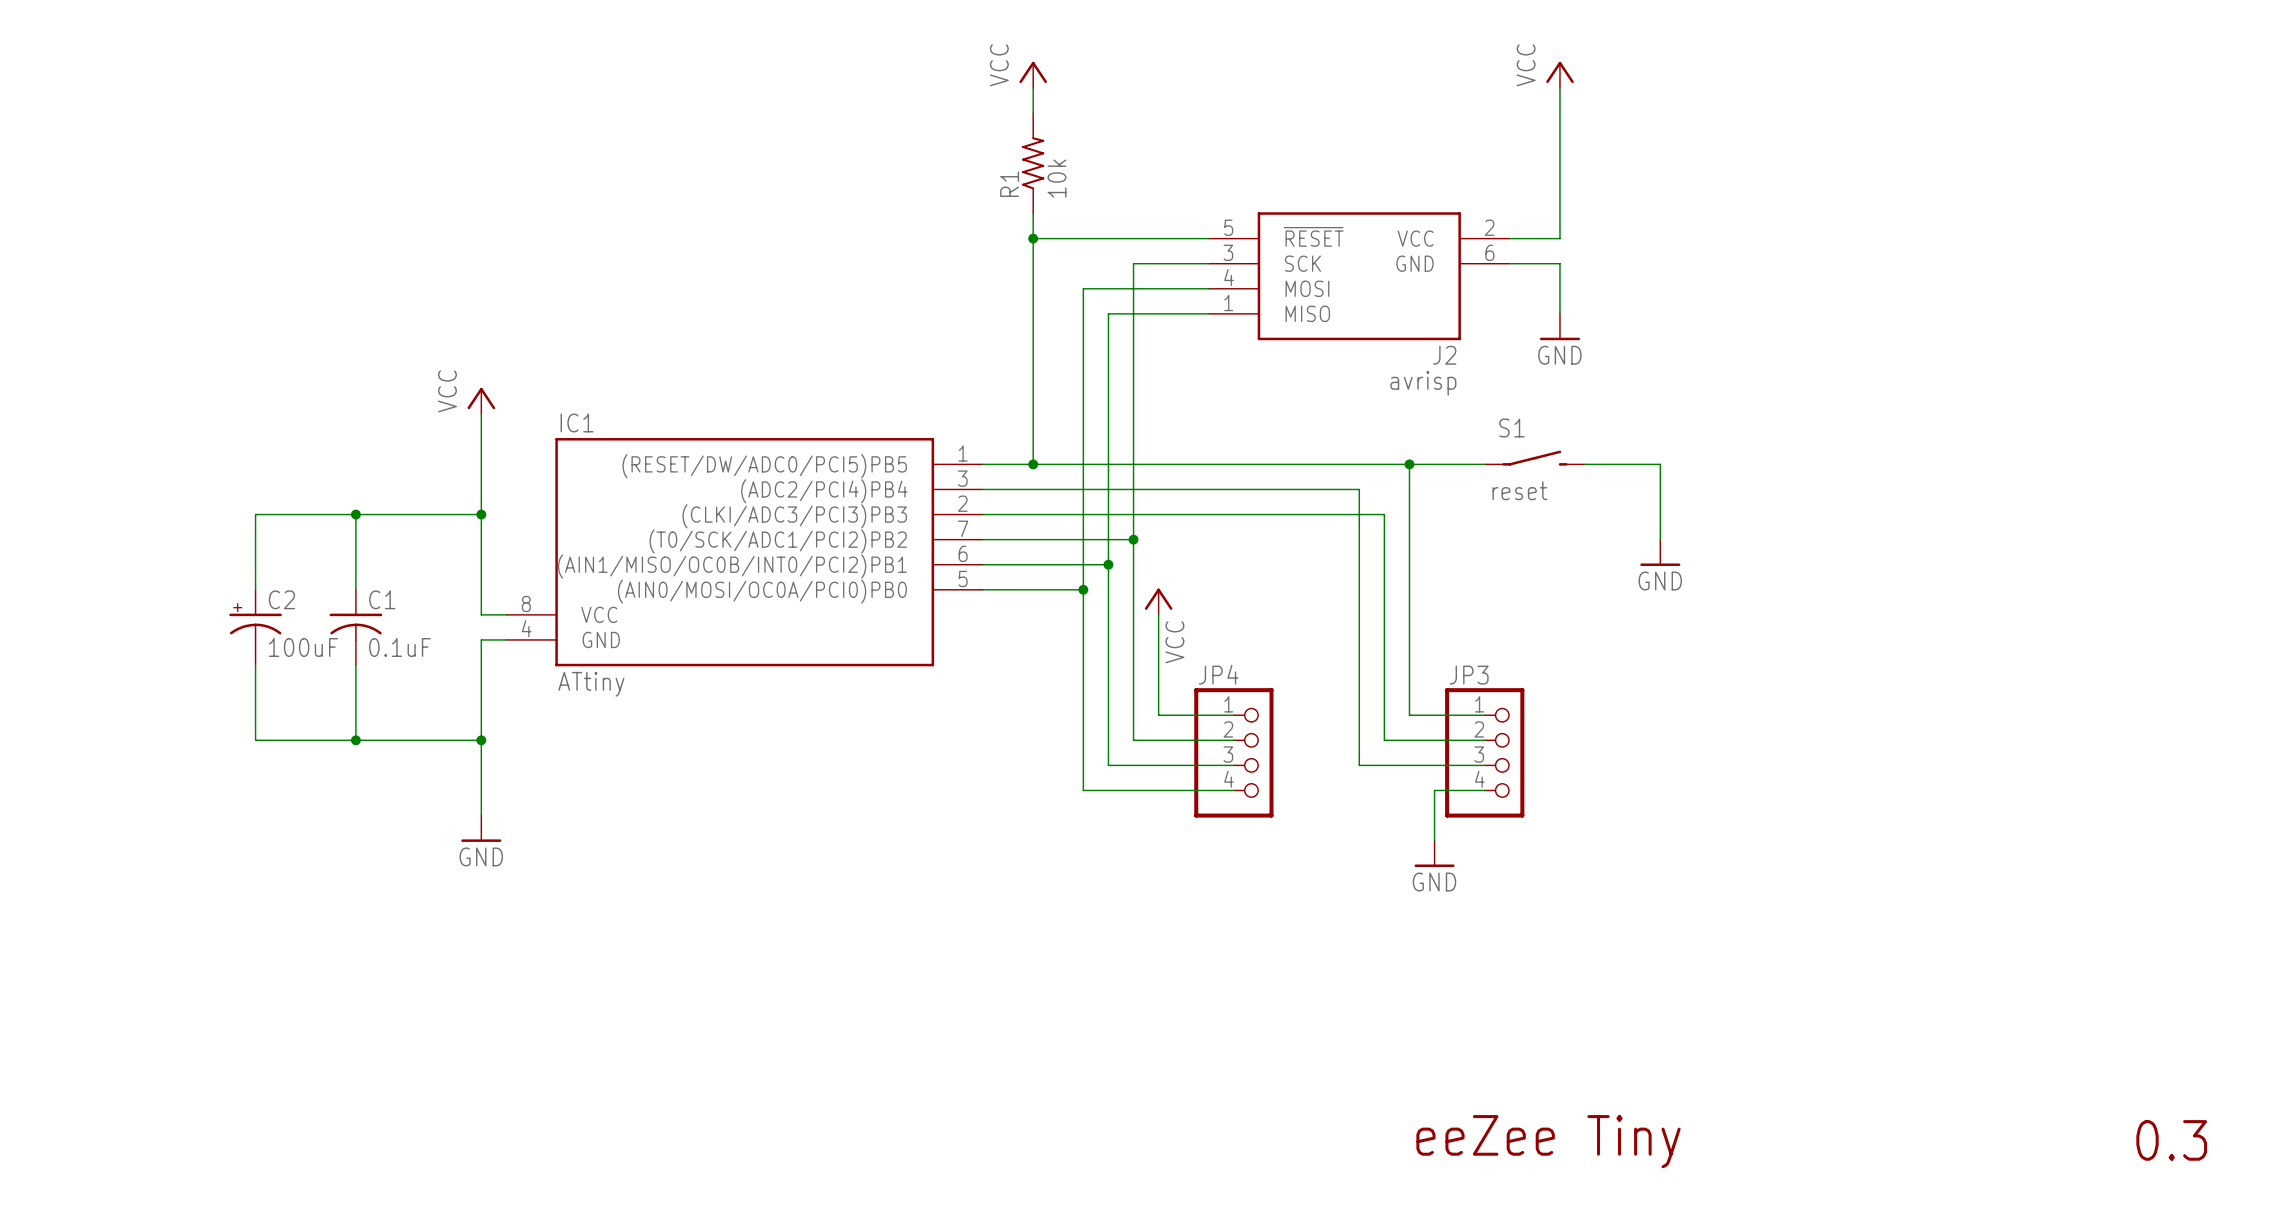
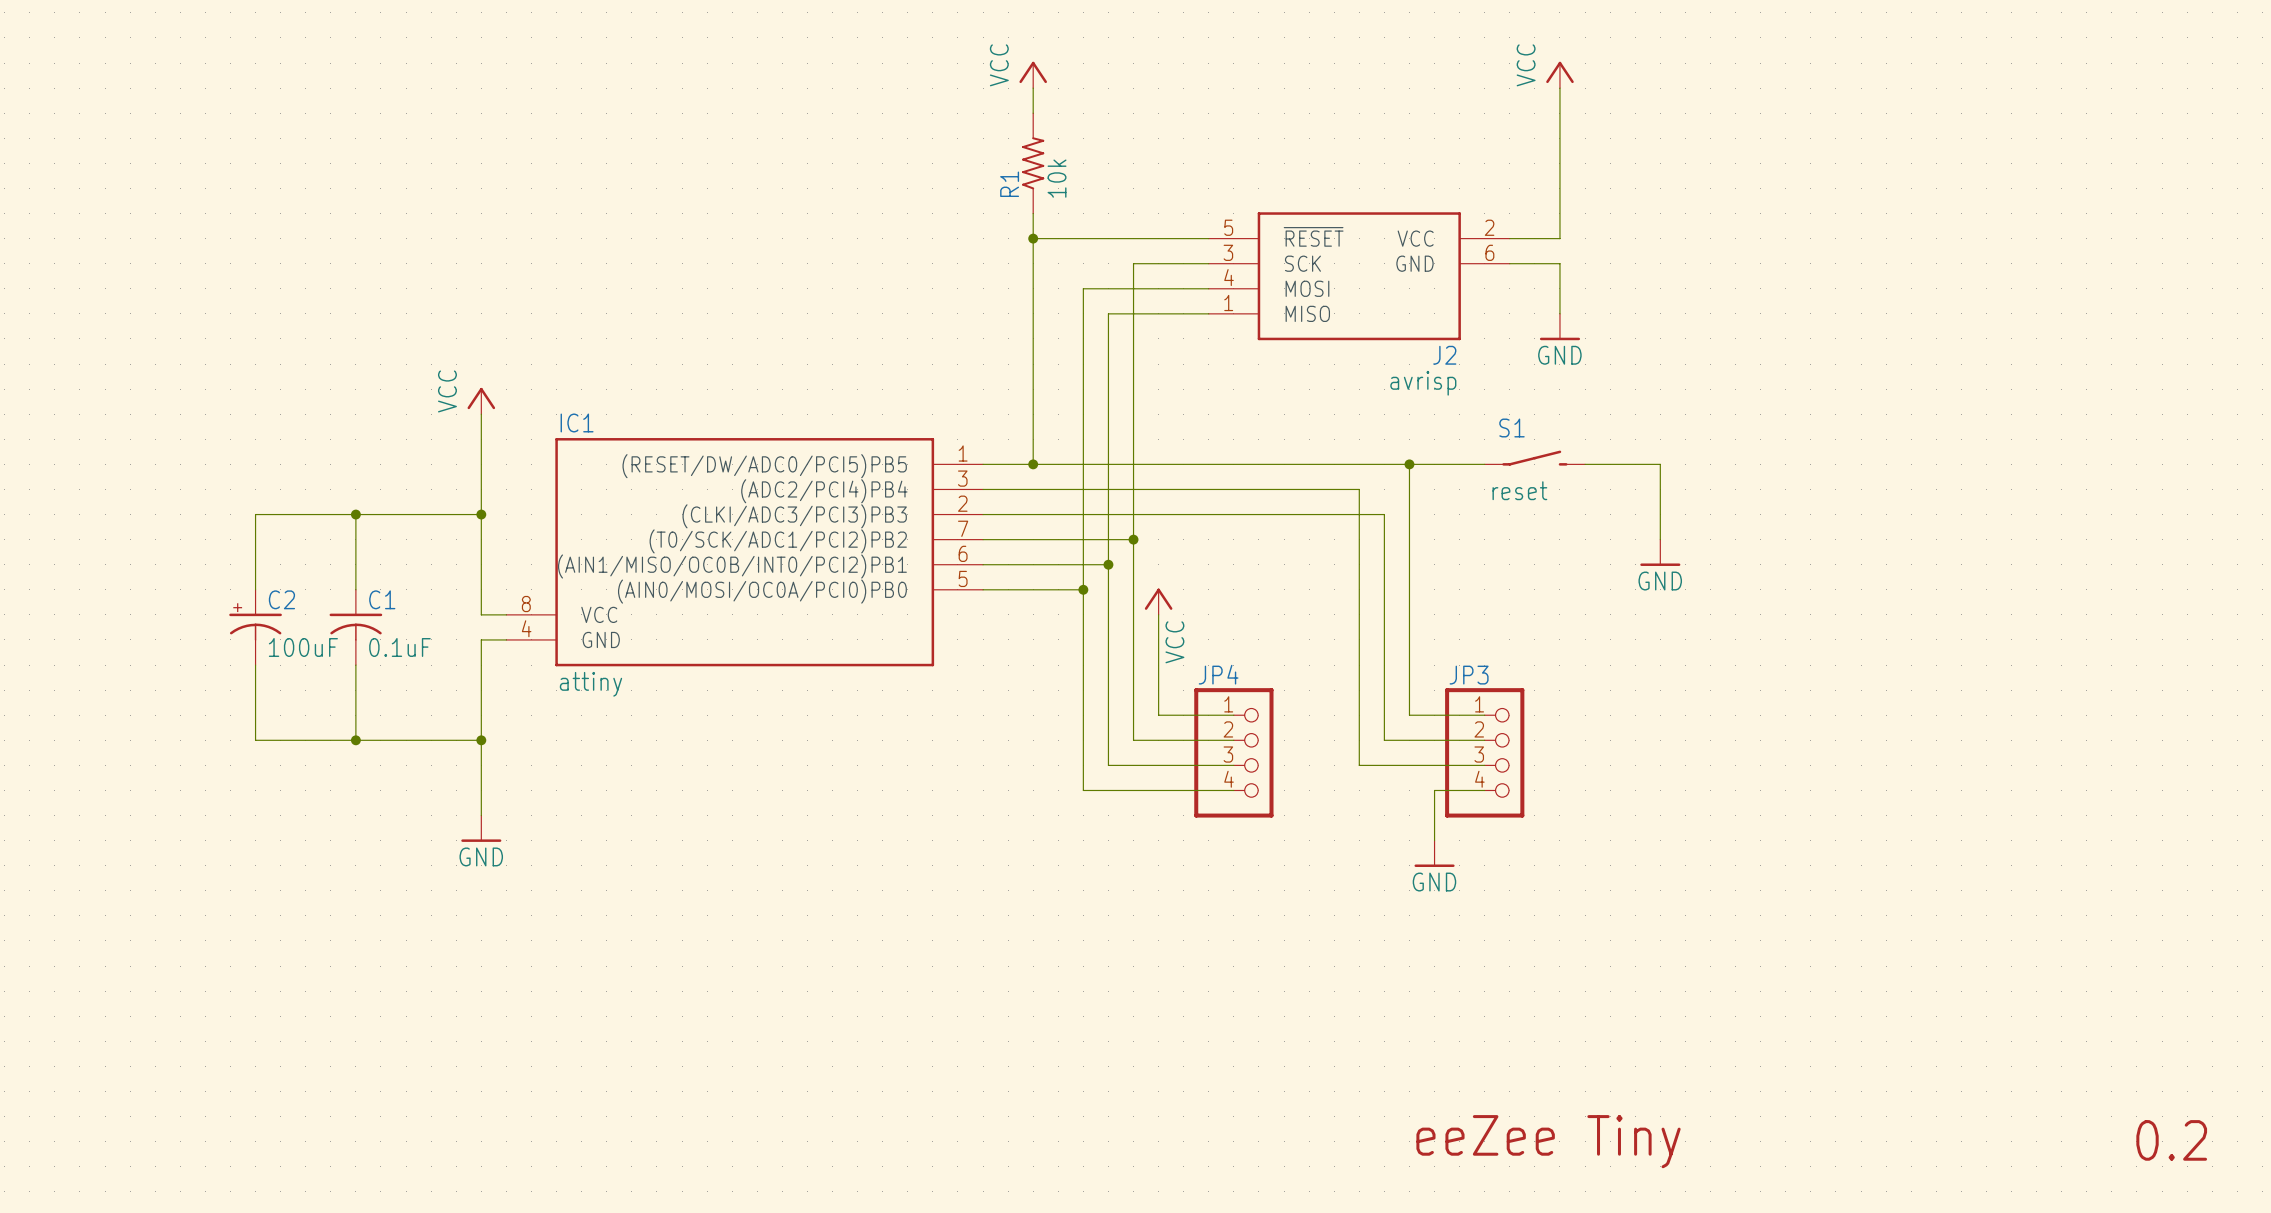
IC1 value: ATtiny (591, 684) -> attiny (590, 684)
text: 0.3 (2171, 1140) -> 0.2 (2171, 1140)

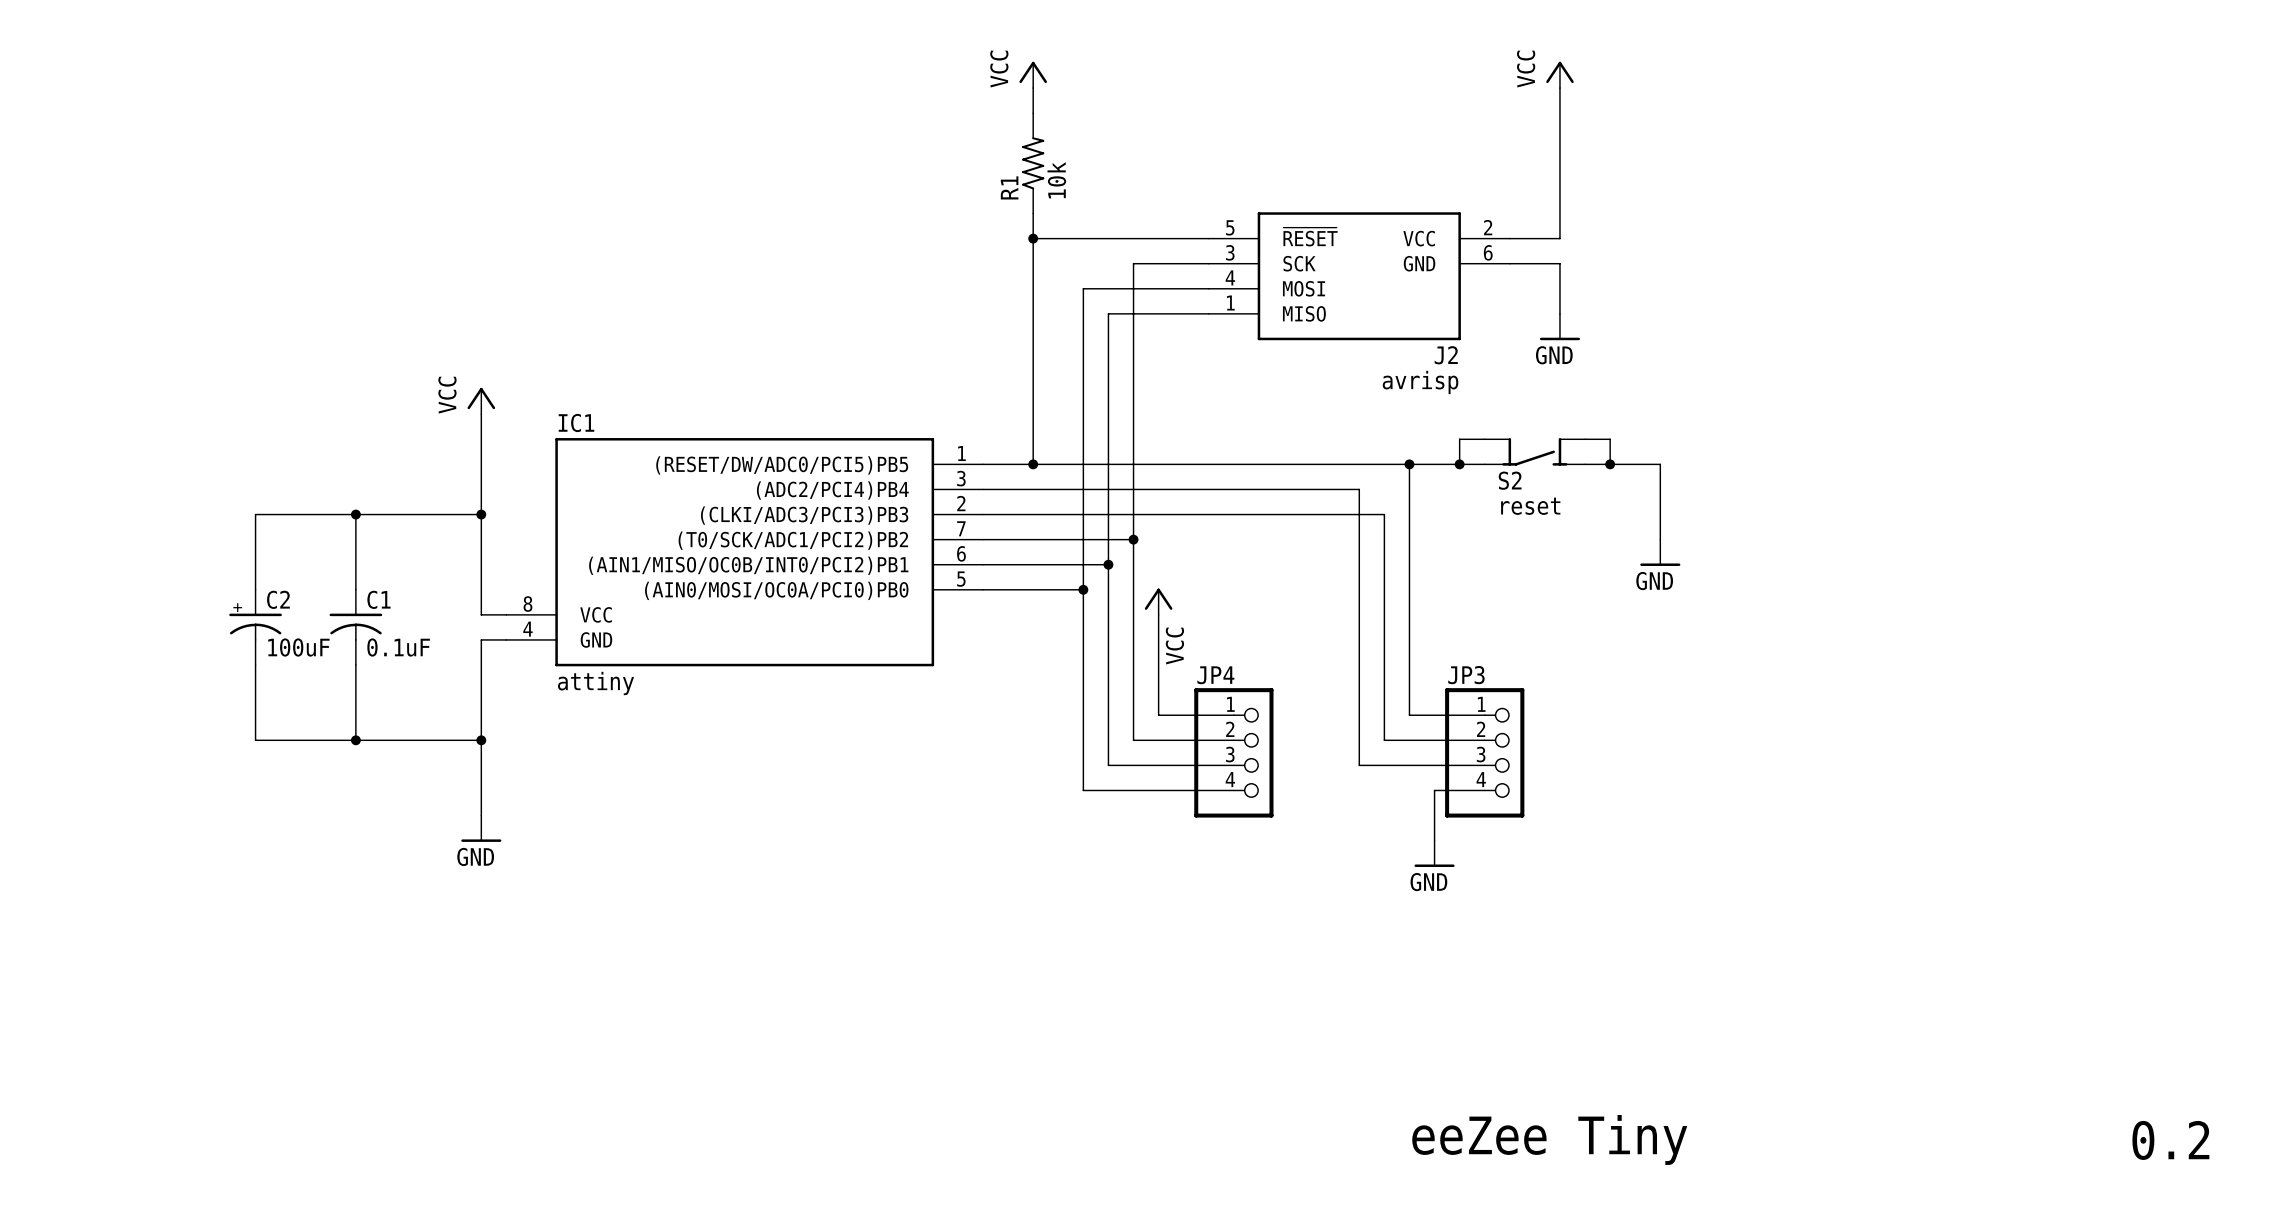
wire: none -> (1484, 439) (1459, 439) (1459, 464)
wire: none -> (1585, 439) (1610, 439) (1610, 464)
S2: none -> reset (1534, 451)
S1: reset (1534, 458) -> none
junction: none -> (1459, 464)
junction: none -> (1610, 464)

